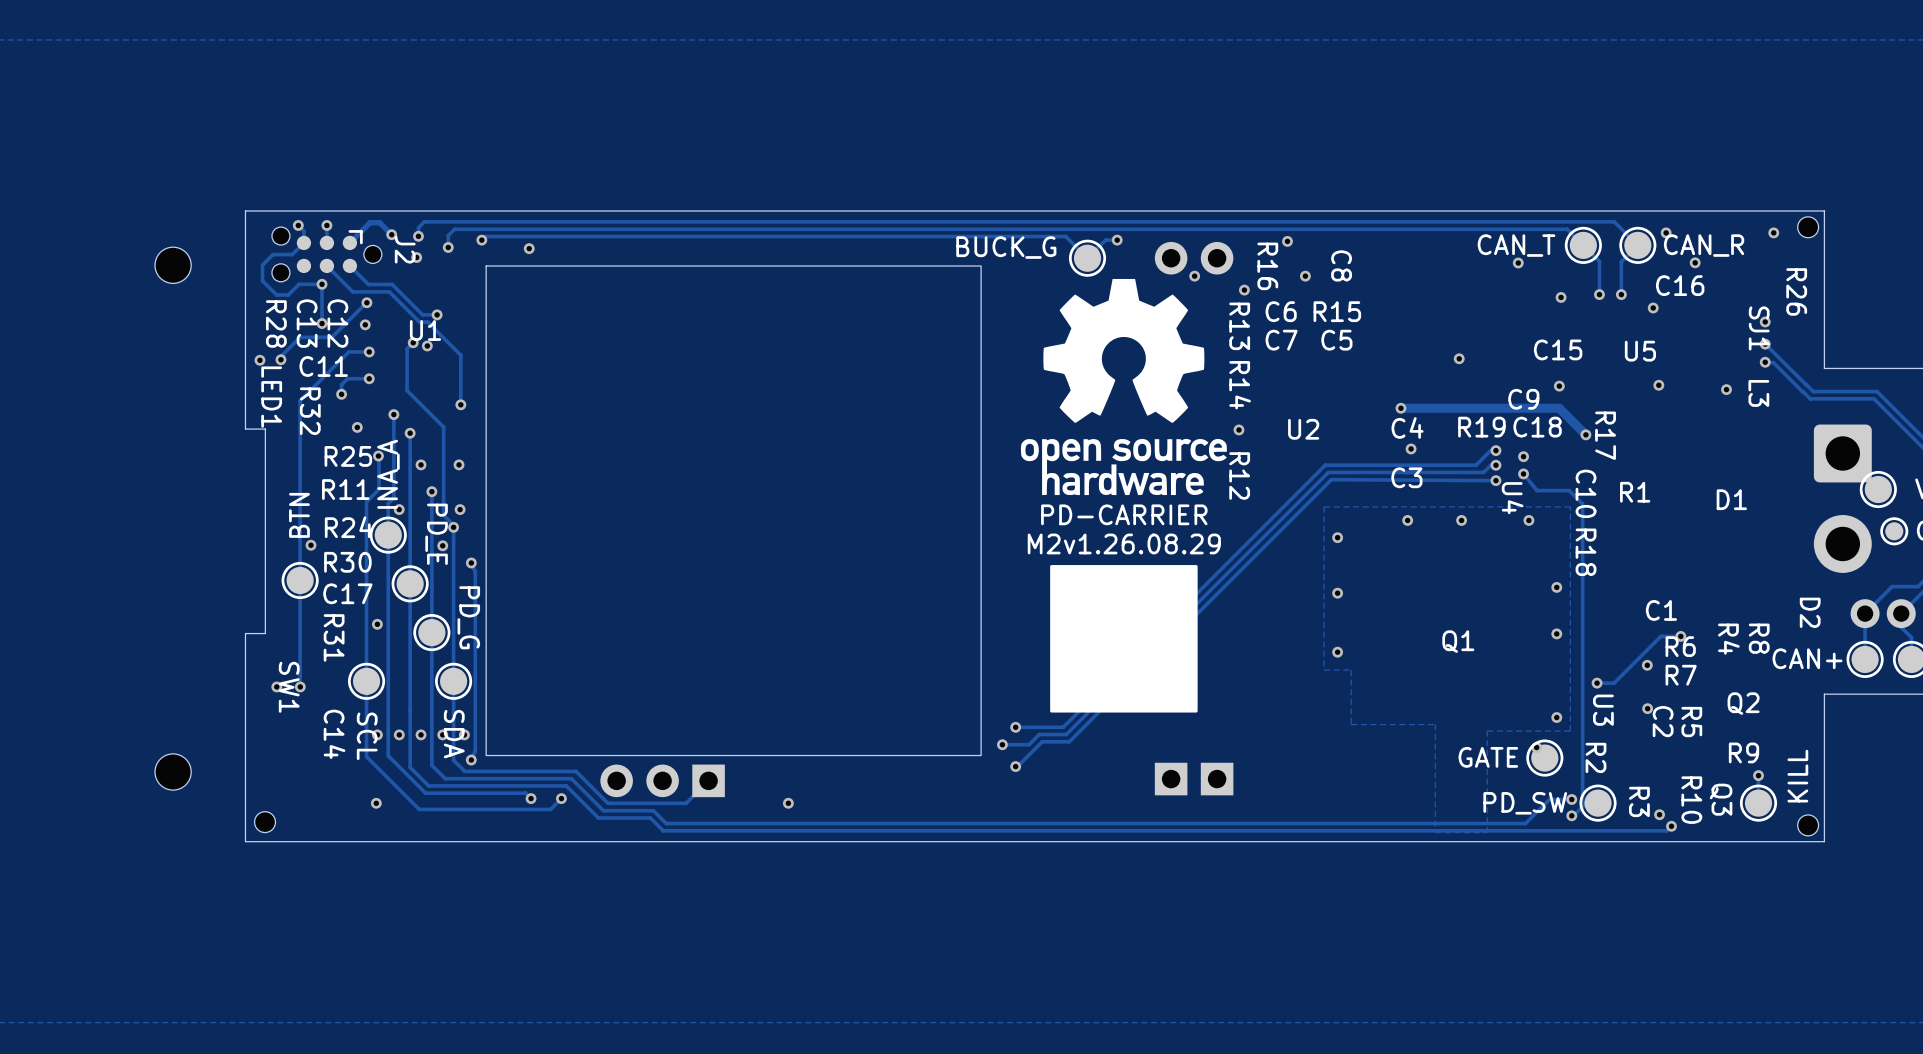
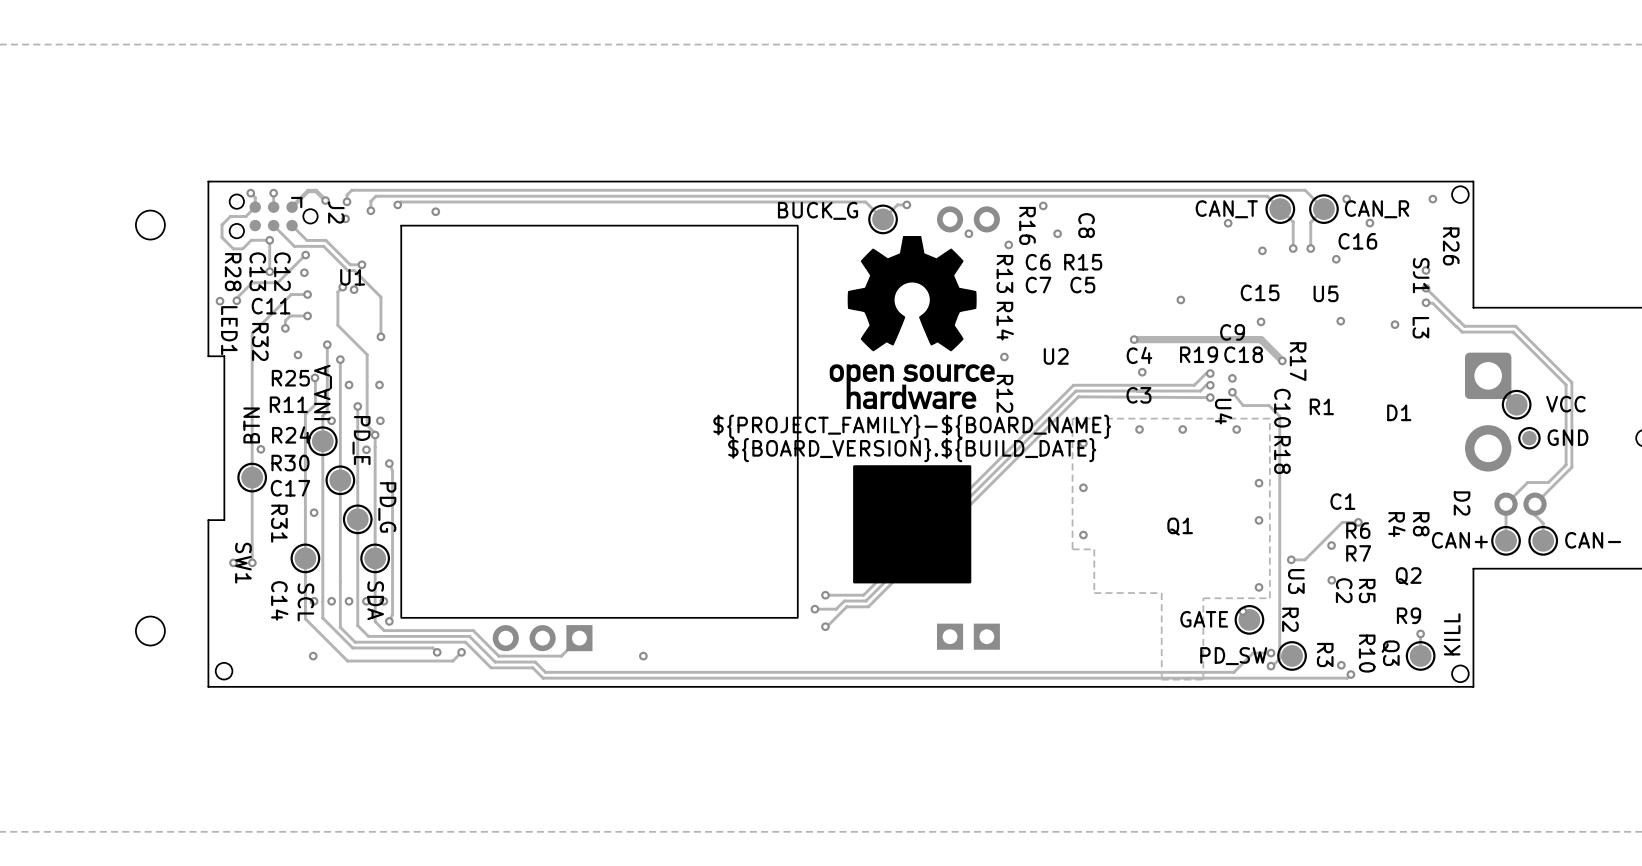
text: PD-CARRIER (1124, 514) -> ${PROJECT_FAMILY}-${BOARD_NAME} (912, 426)
text: M2v1.26.08.29 (1124, 543) -> ${BOARD_VERSION}.${BUILD_DATE} (912, 450)

